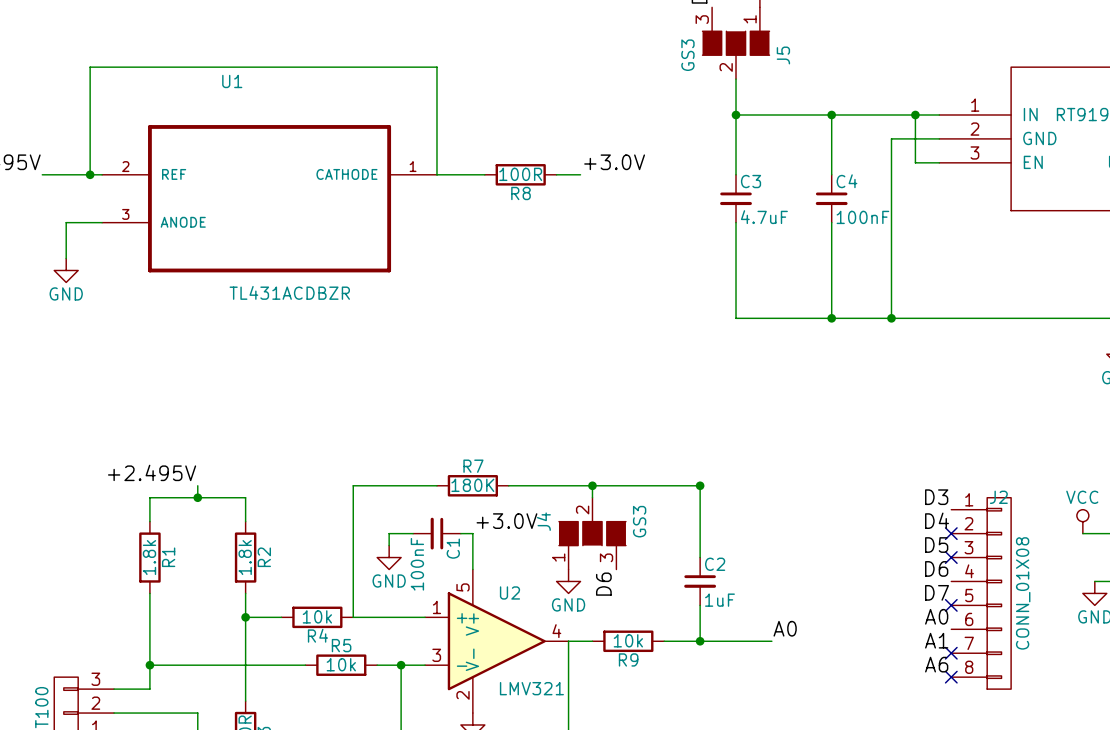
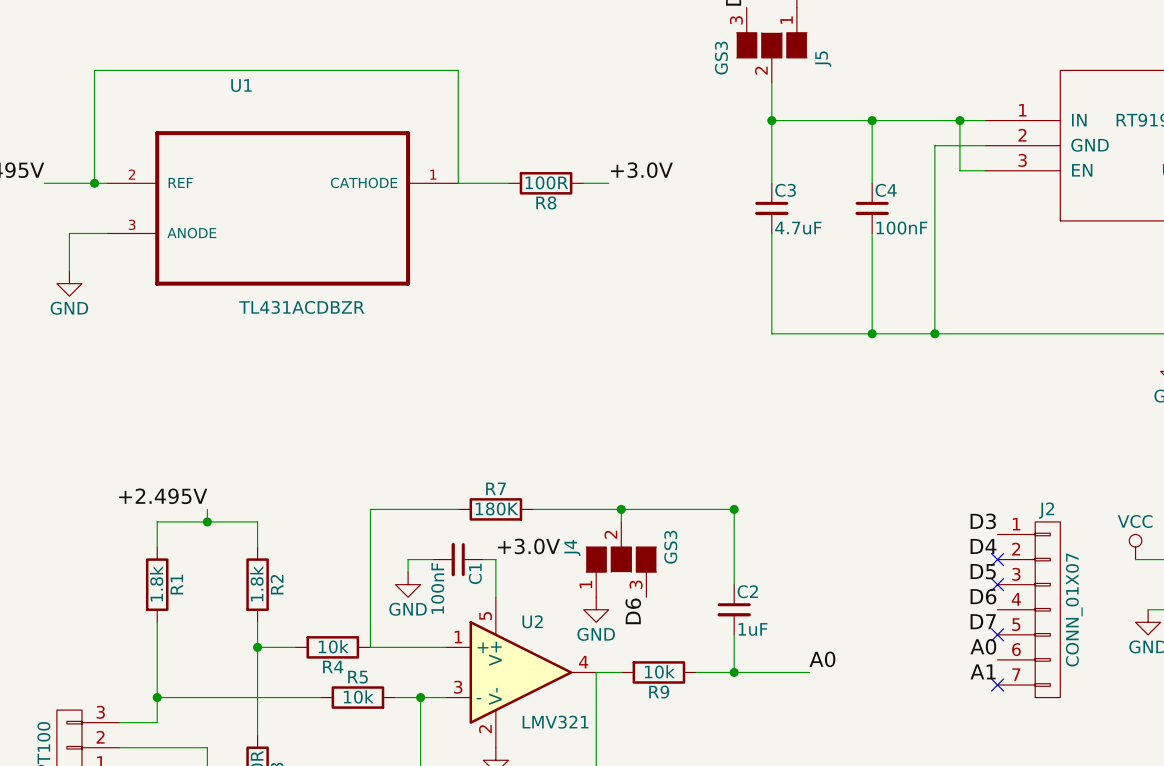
J2 symbol: [951, 497, 1012, 690] -> [997, 521, 1061, 698]
J2 value: CONN_01X08 (1023, 593) -> CONN_01X07 (1074, 610)
label: A6 (936, 664) -> none
no-connect mark: (951, 677) -> none

